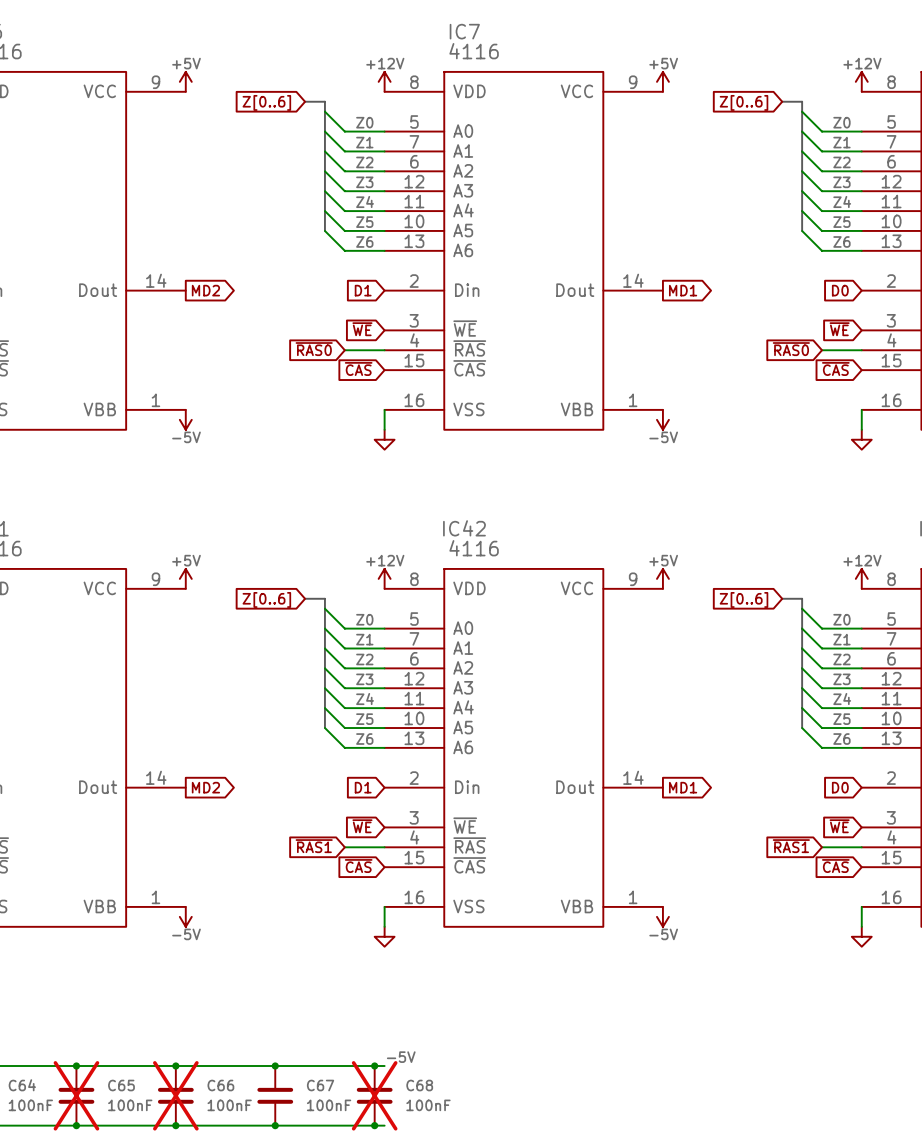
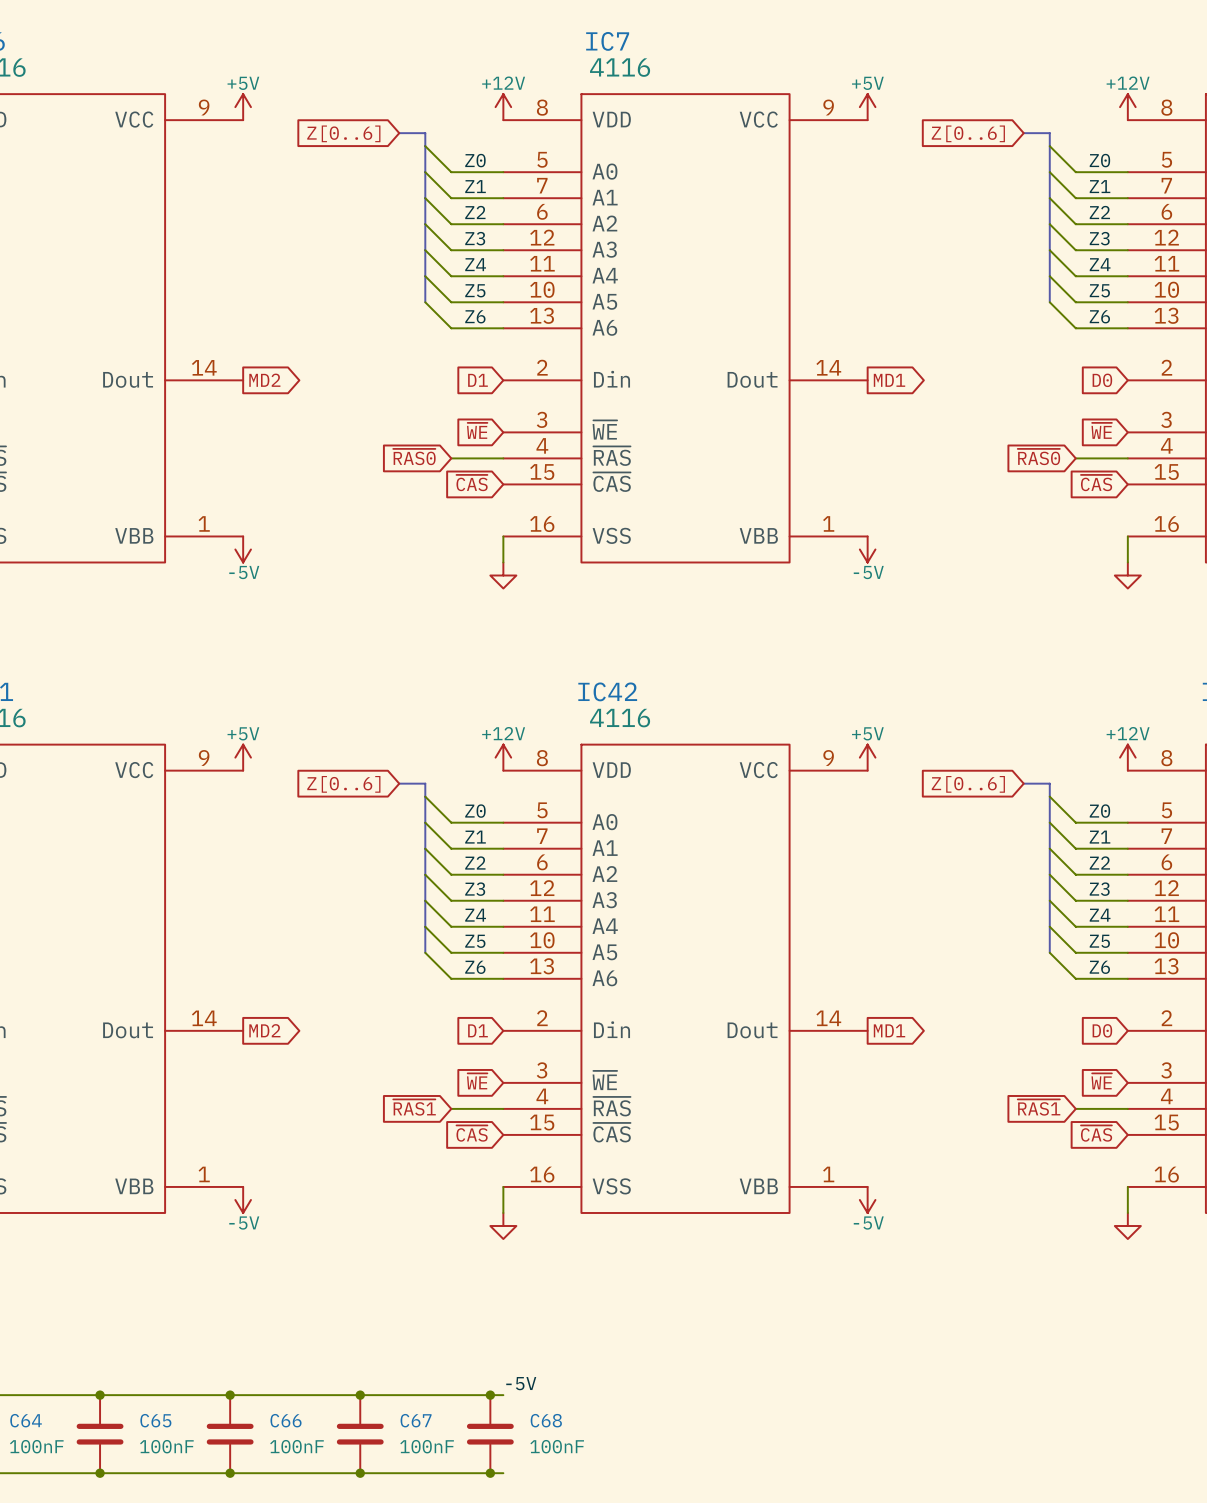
C65 do-not-place cross: (76, 1095) -> none
C66 do-not-place cross: (175, 1095) -> none
C68 do-not-place cross: (374, 1095) -> none

